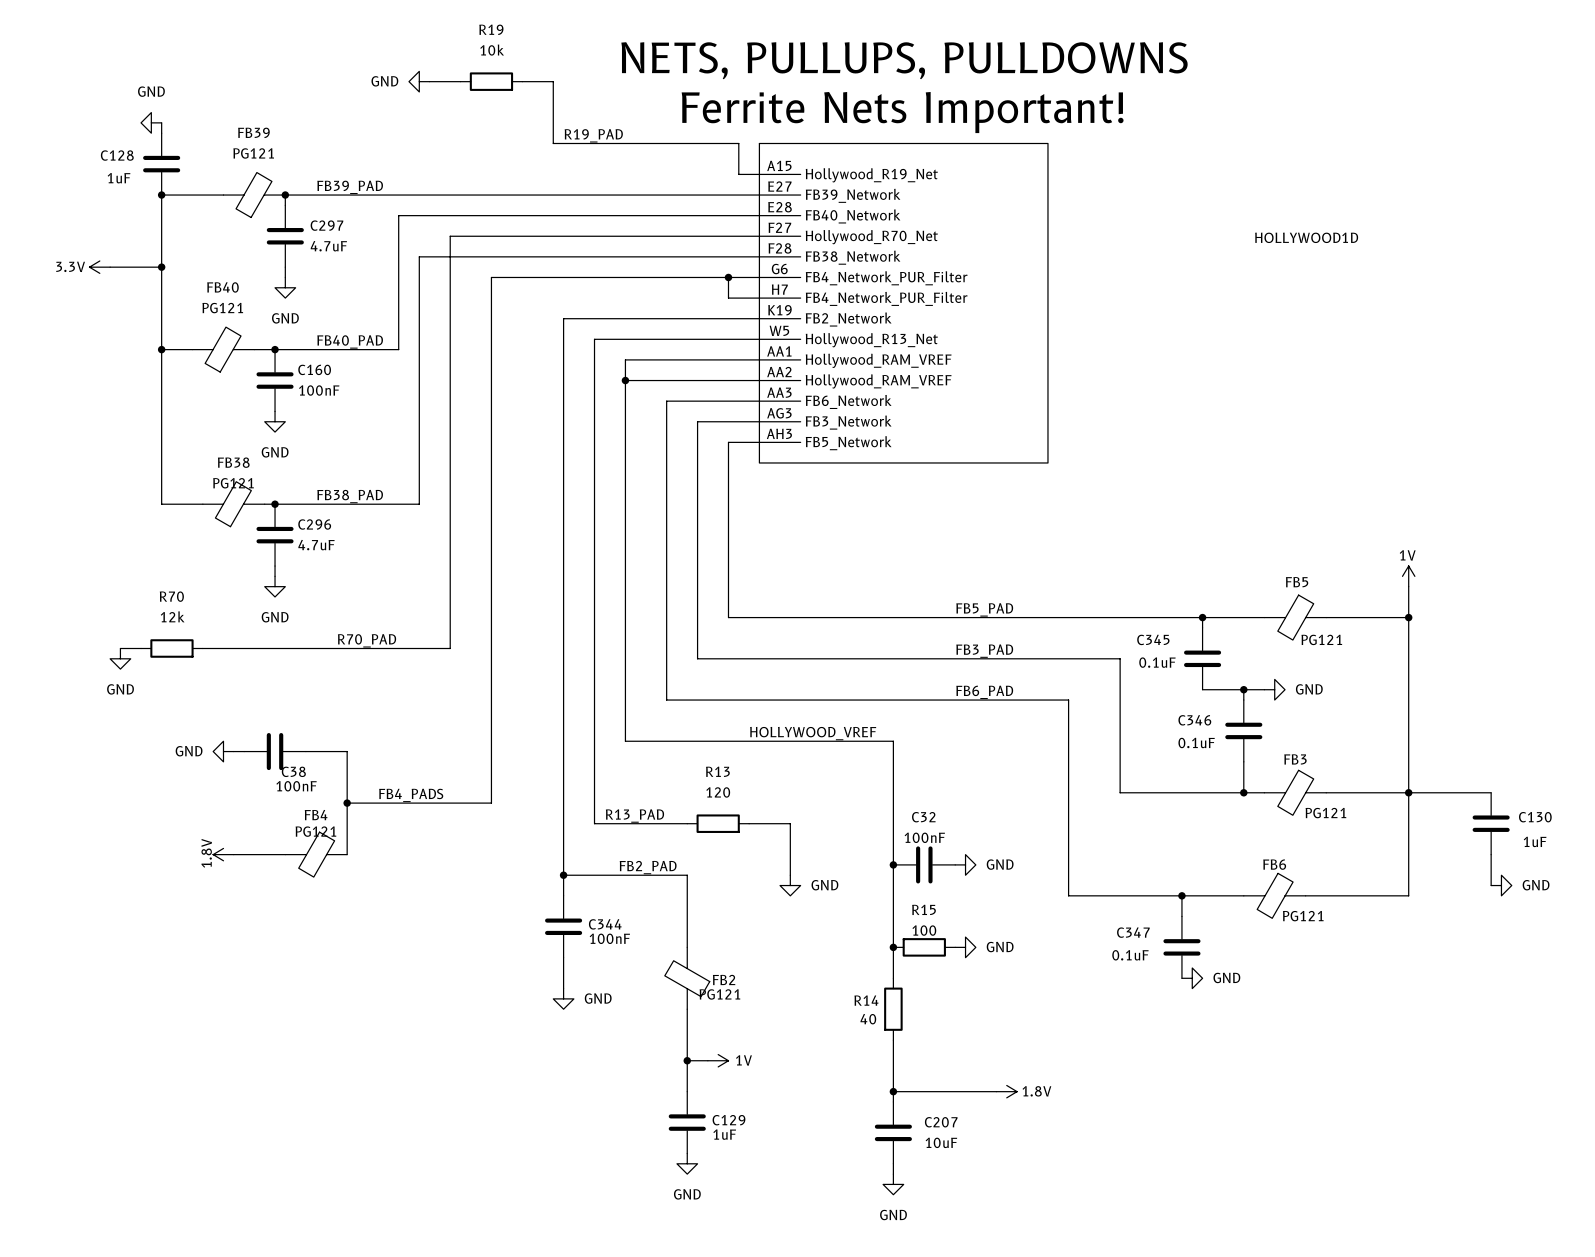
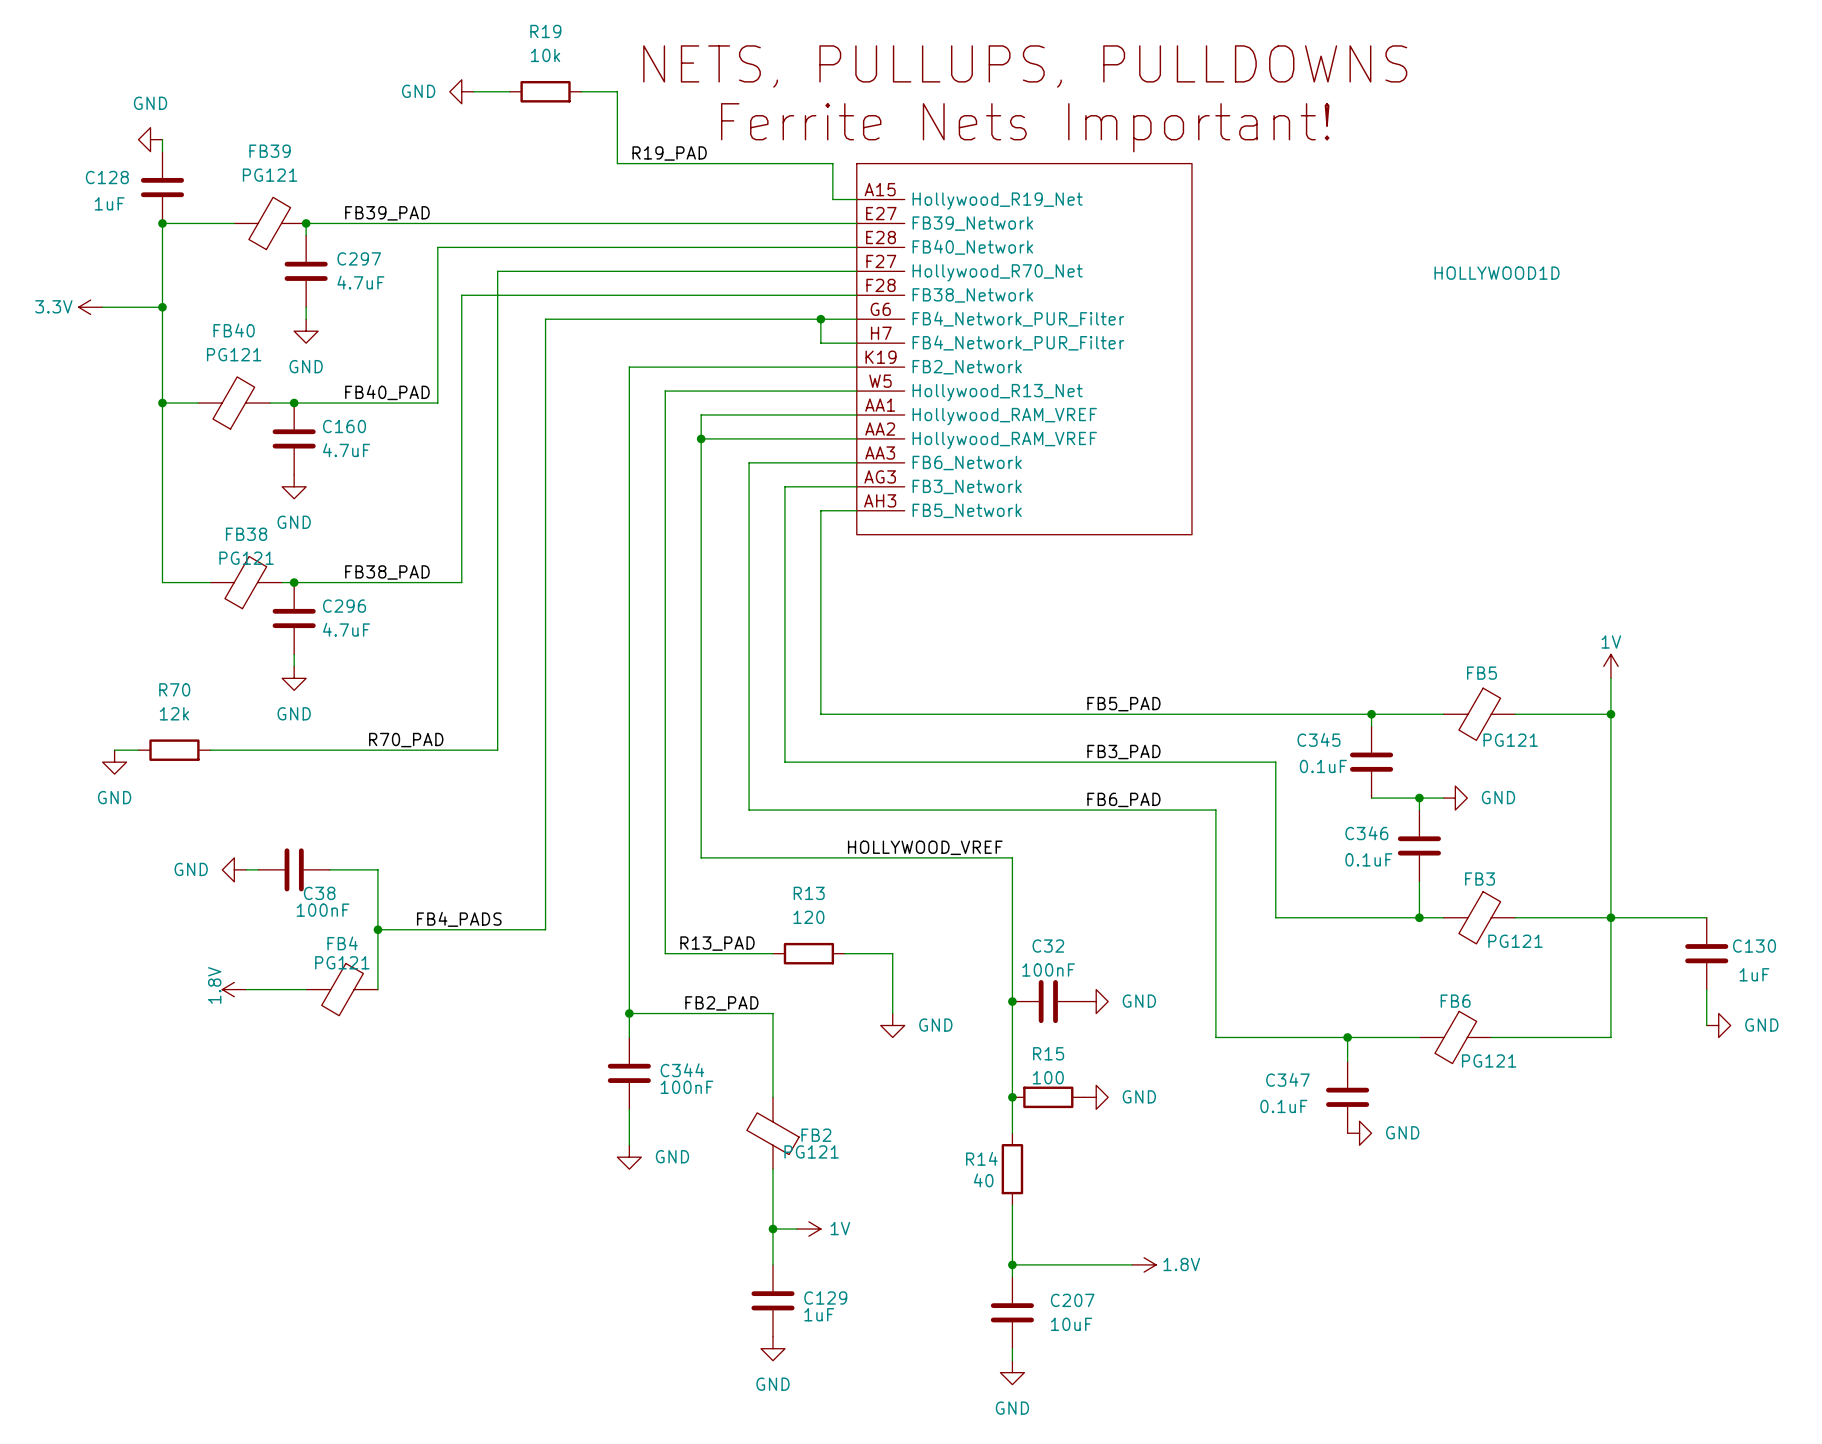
C160 value: 100nF (319, 390) -> 4.7uF (346, 450)

